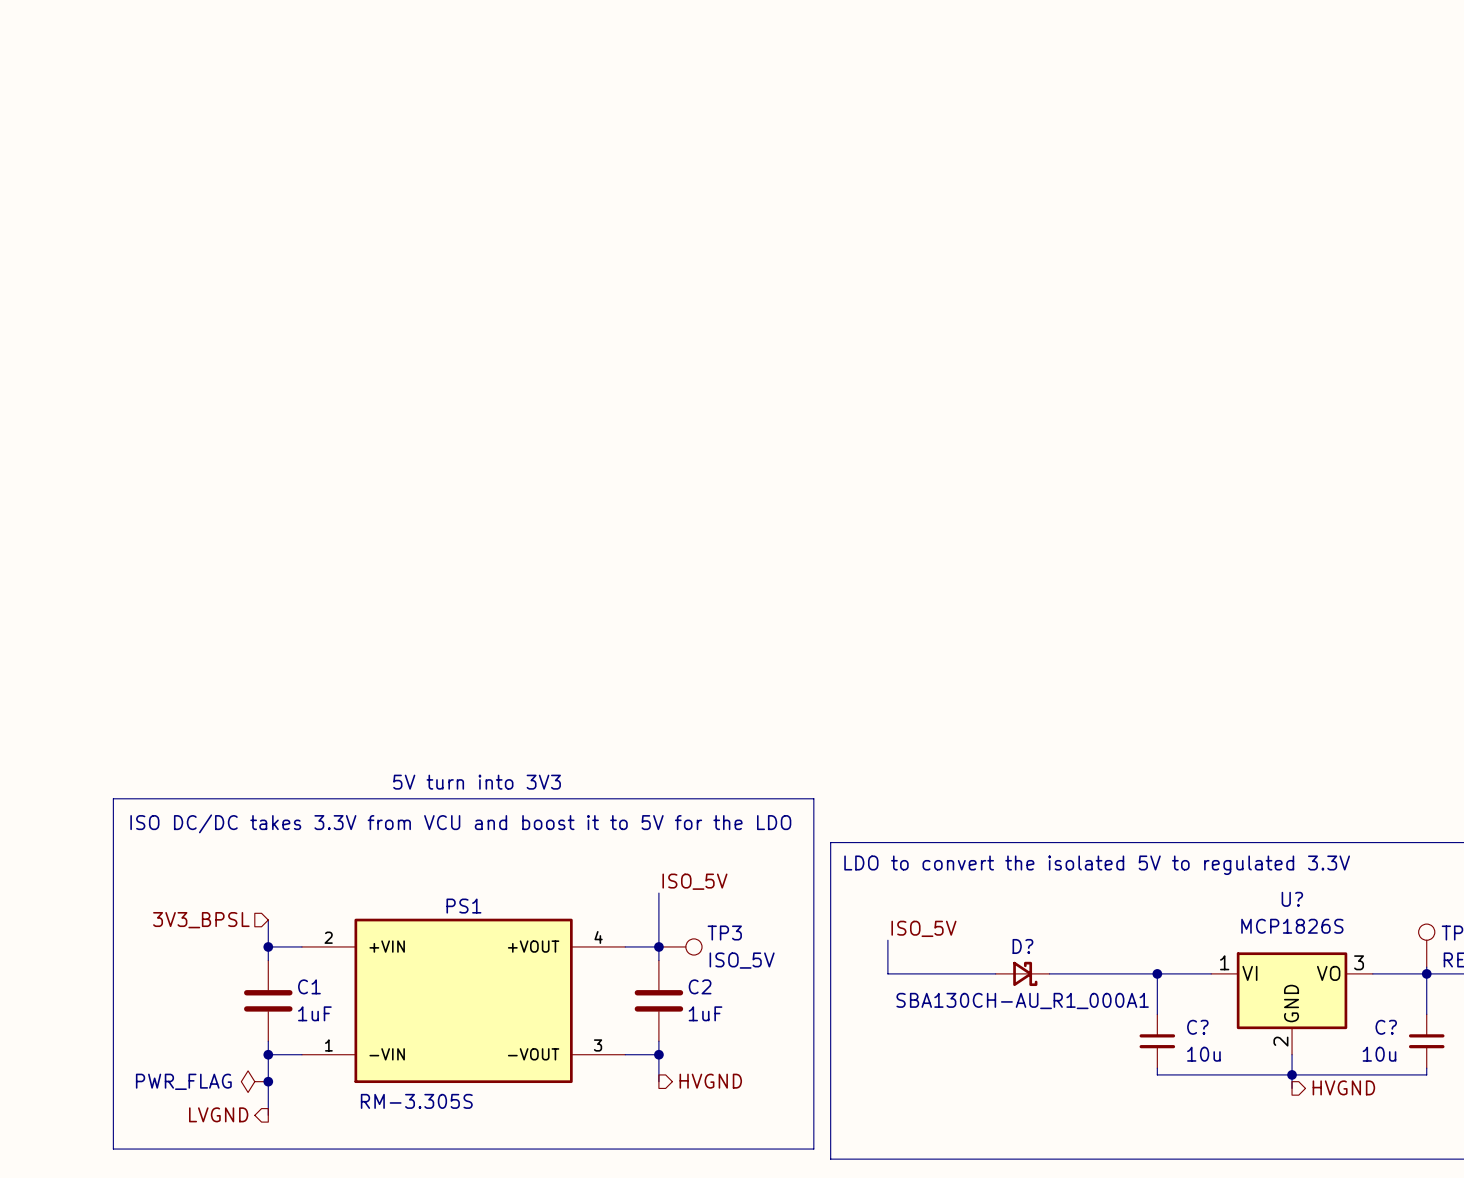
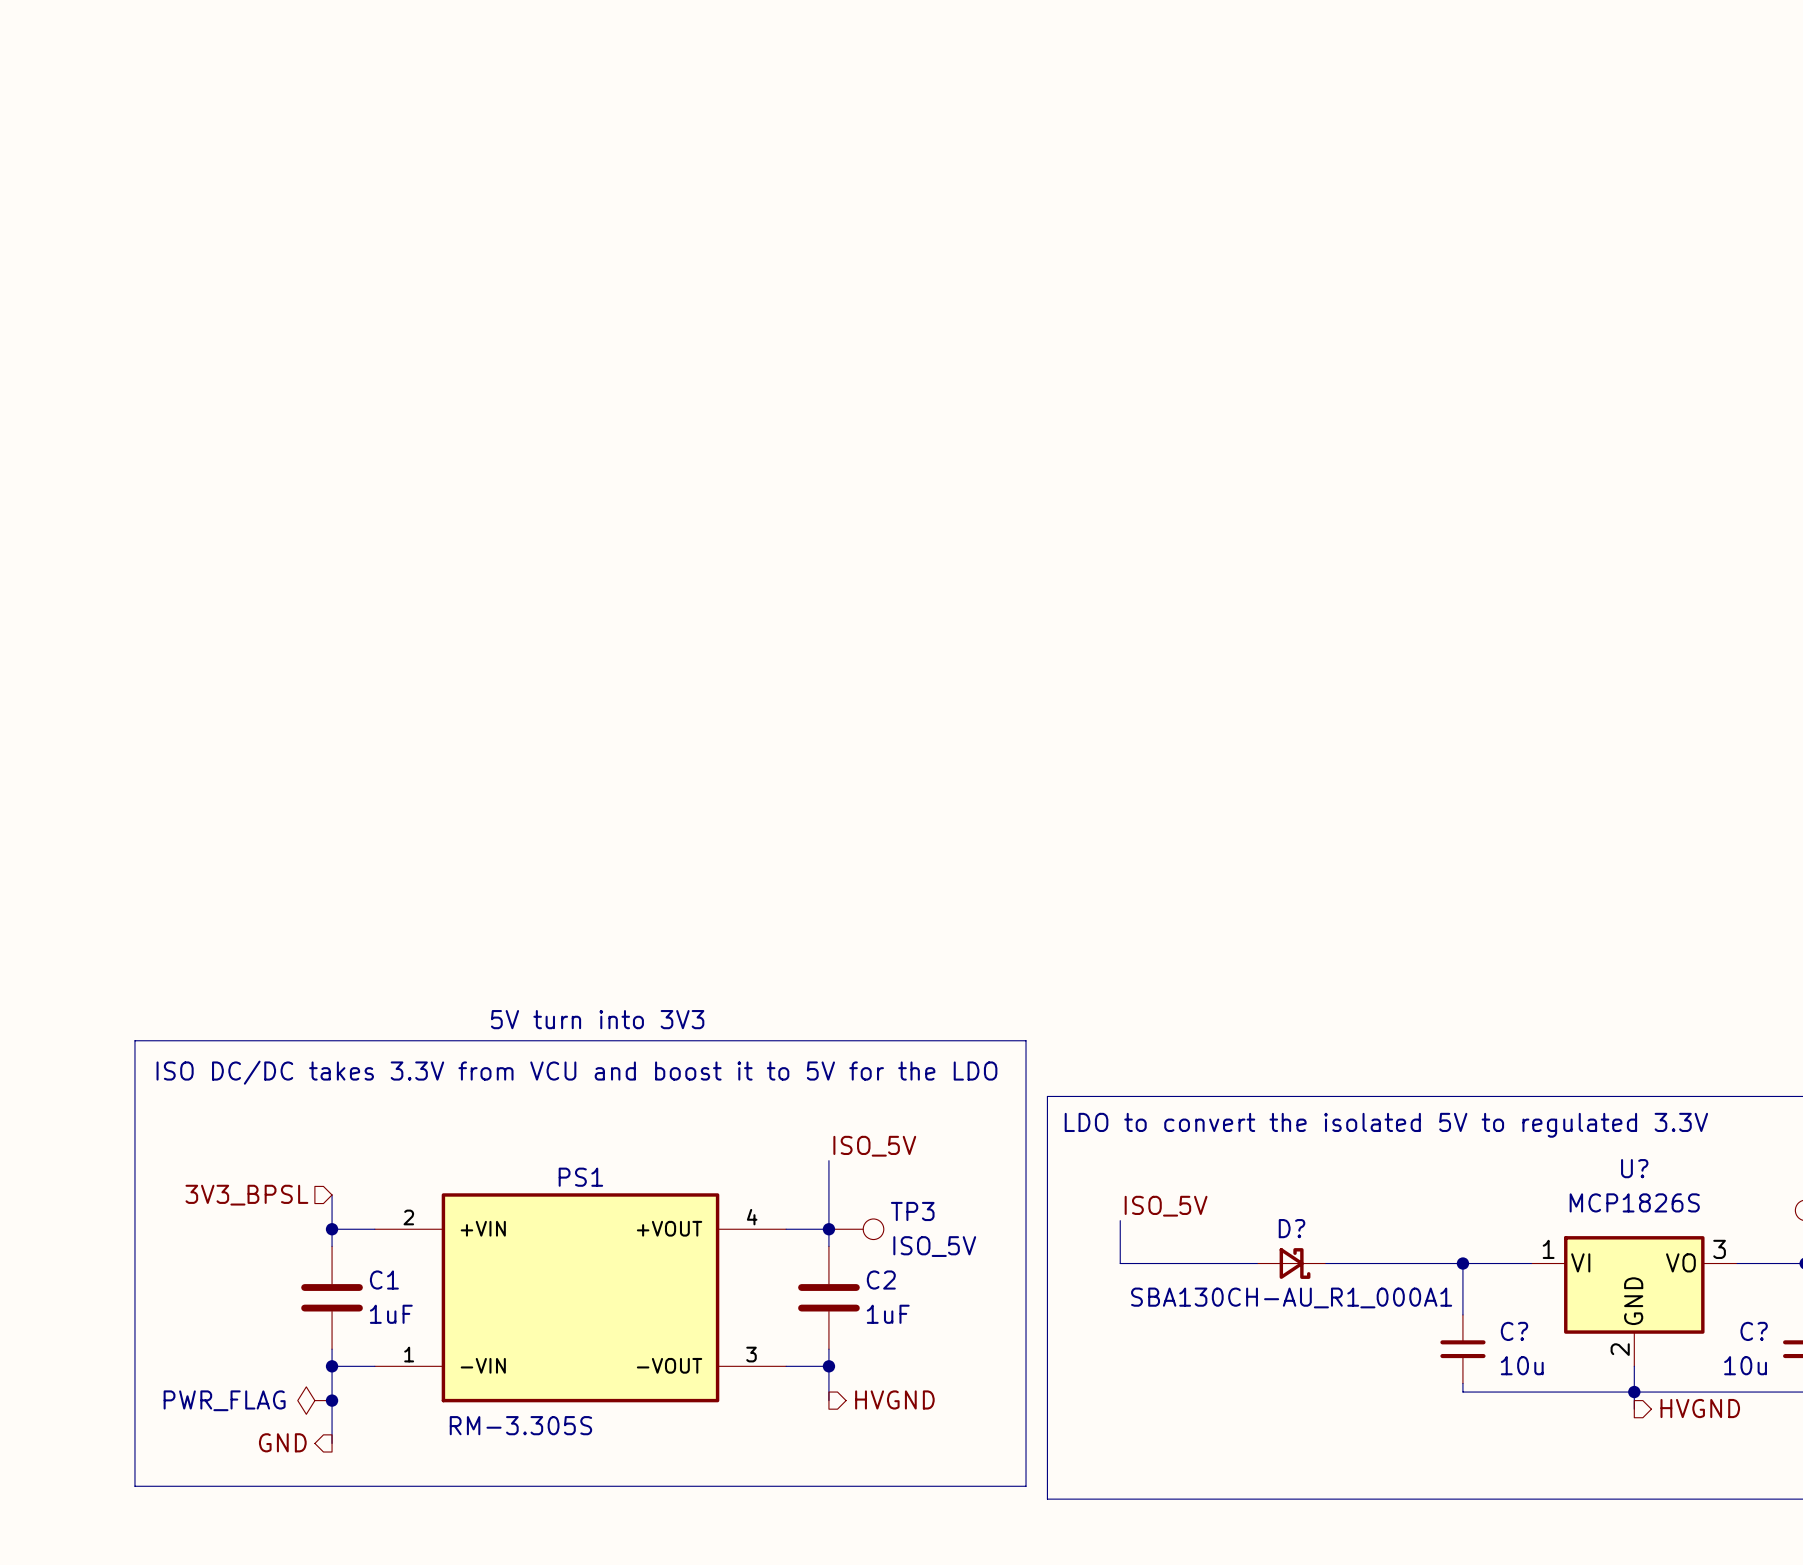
hierarchical label: LVGND (218, 1114) -> GND (282, 1442)

